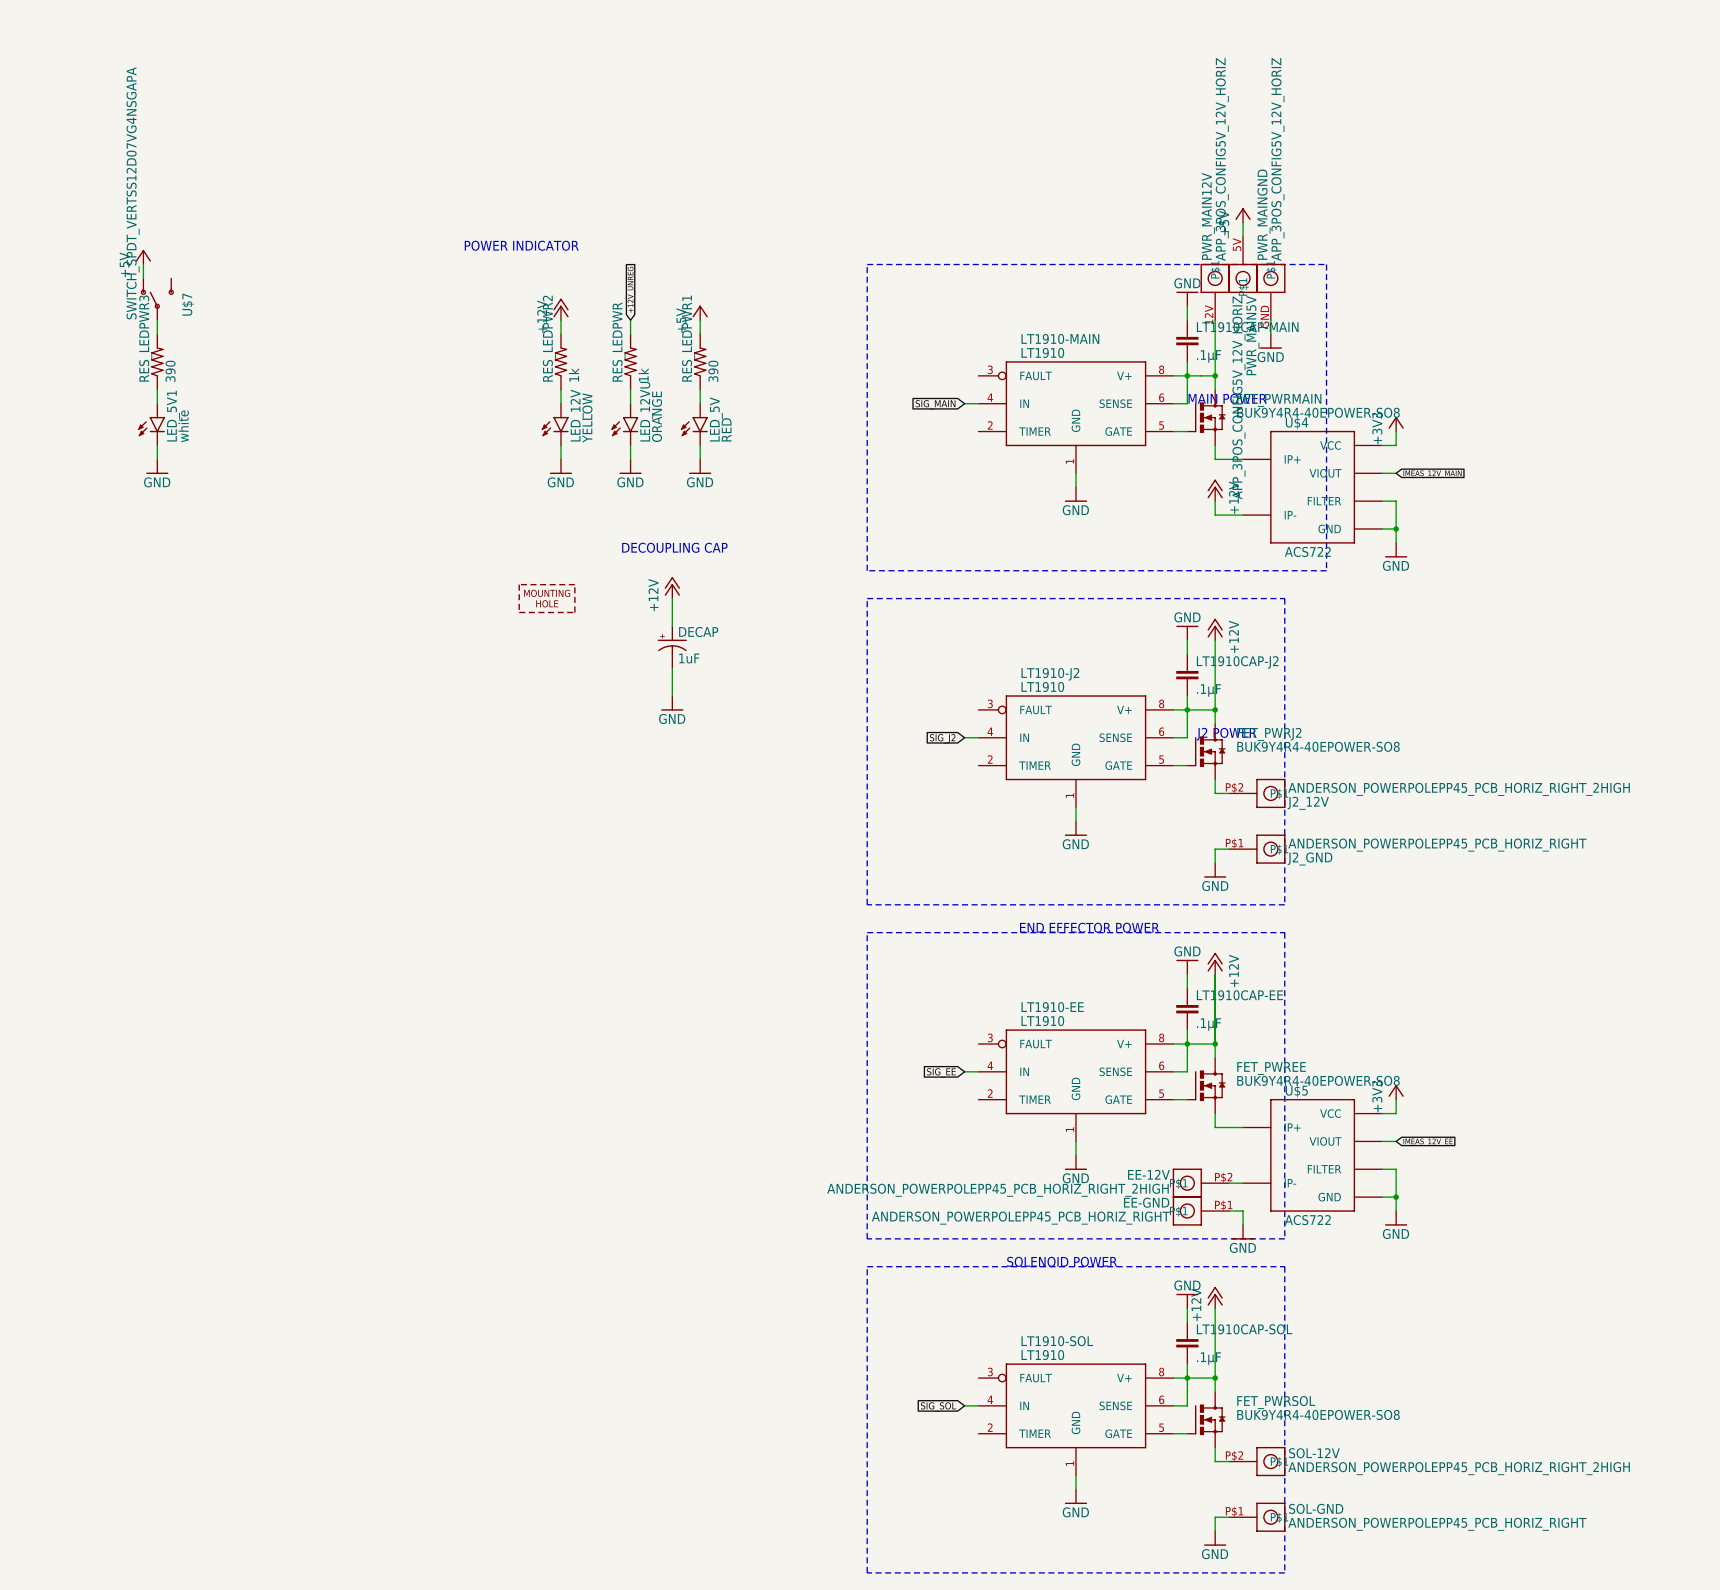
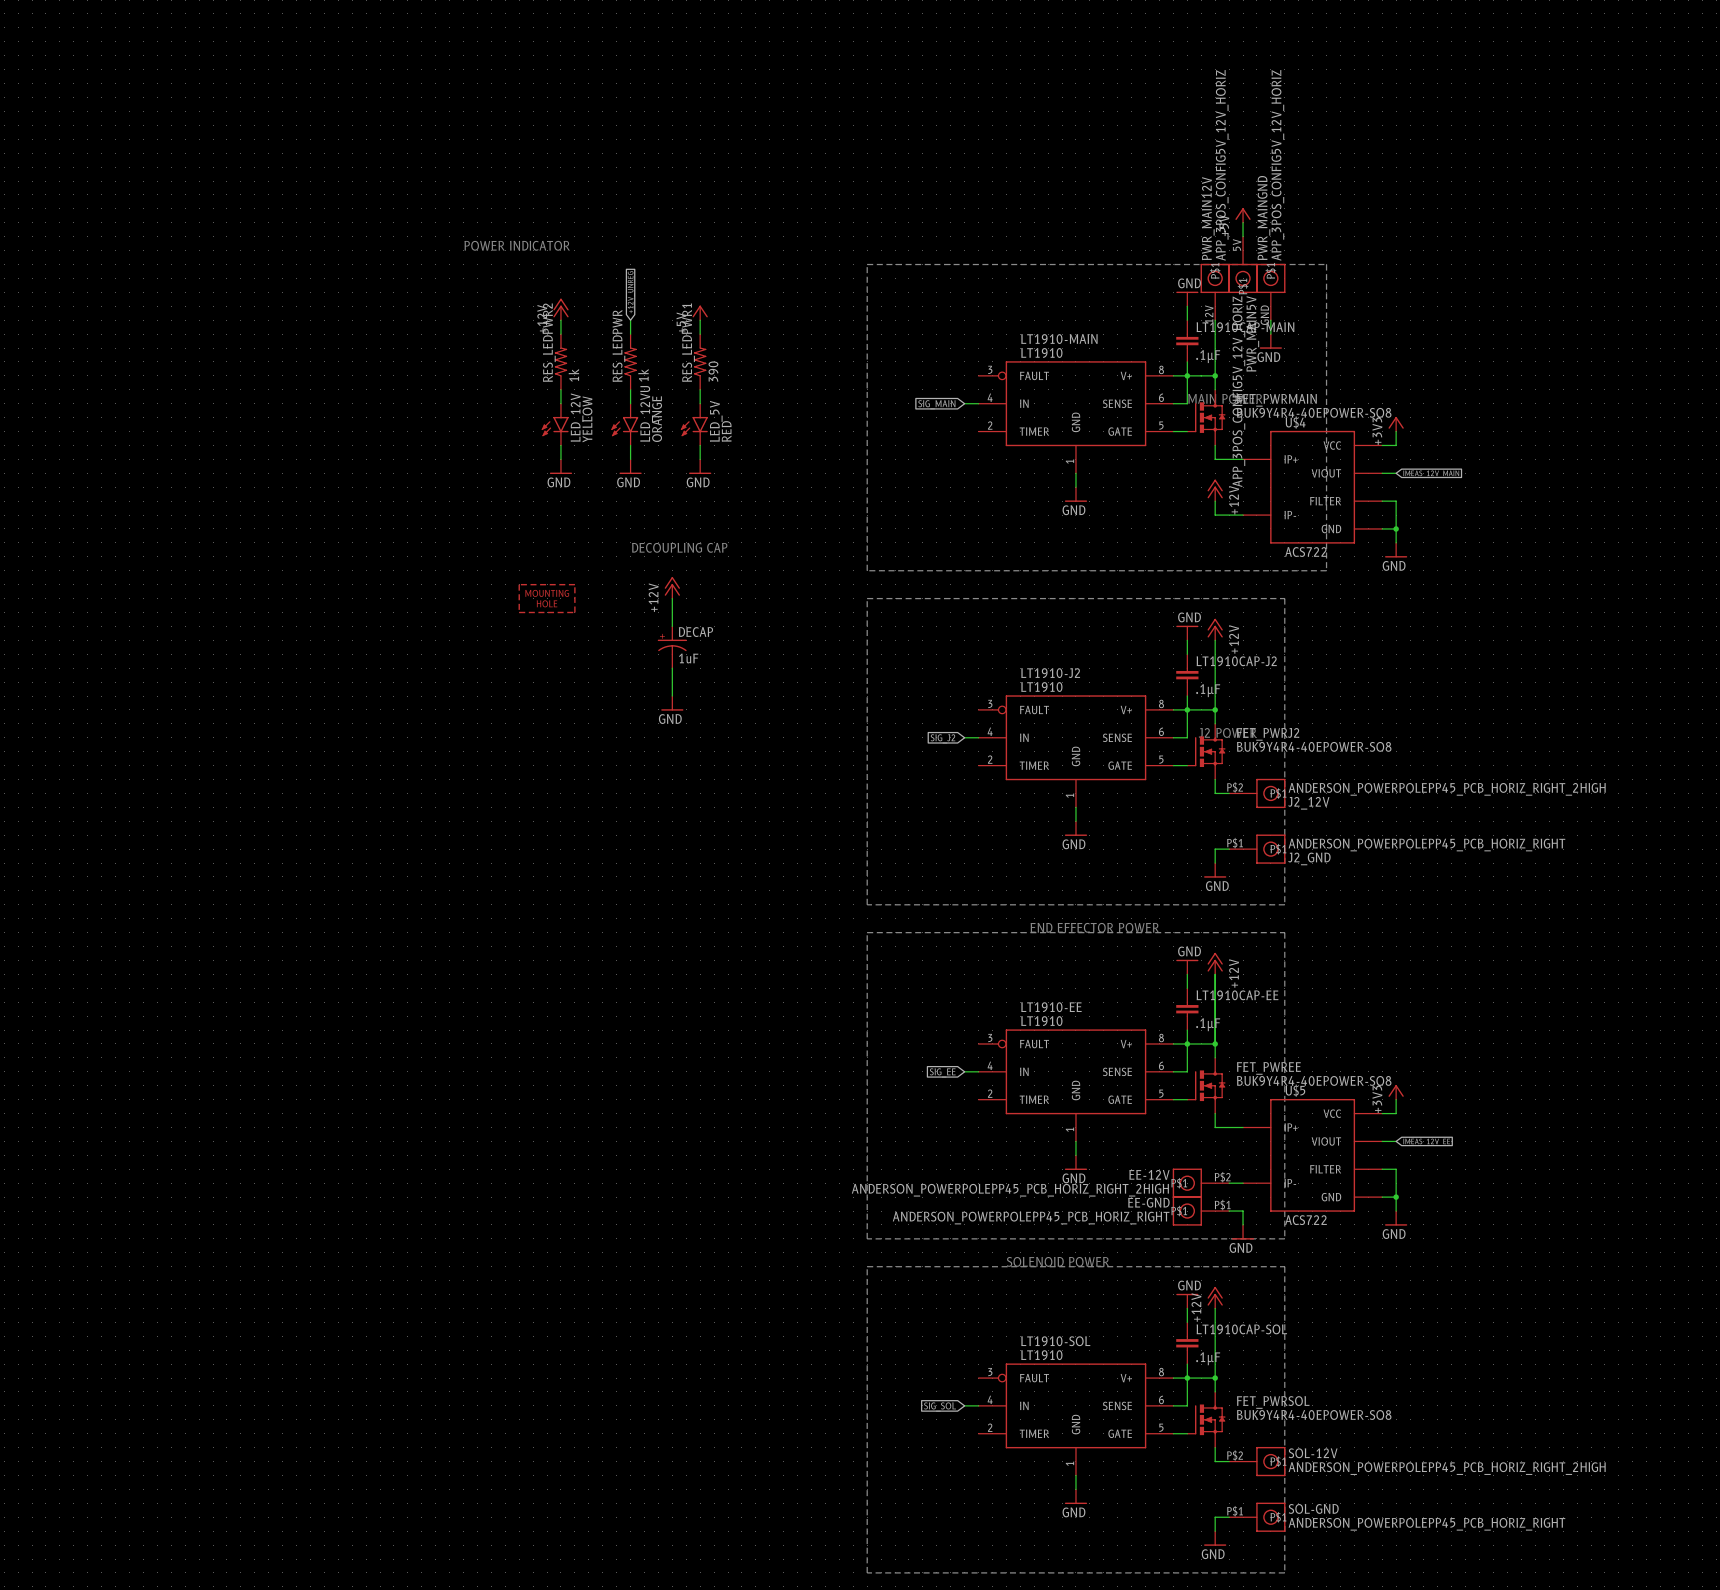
power symbol: +5V (143, 257) -> none
wire: (143, 264) (143, 278) -> none
U$7: SWITCH_SPDT_VERTSS12D07VG4NSGAPA (157, 299) -> none
wire: (157, 320) (157, 334) -> none
RES_LEDPWR3: 390 (157, 361) -> none
wire: (157, 389) (157, 403) -> none
LED_5V1: white (151, 424) -> none
wire: (157, 445) (157, 459) -> none
power symbol: GND (157, 466) -> none

